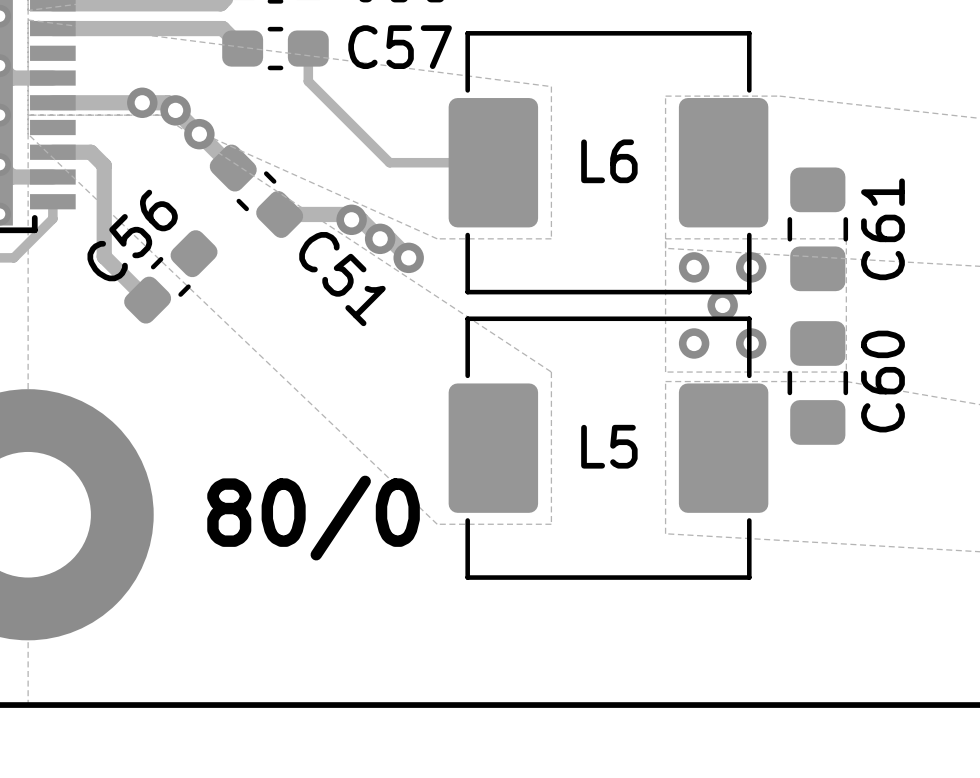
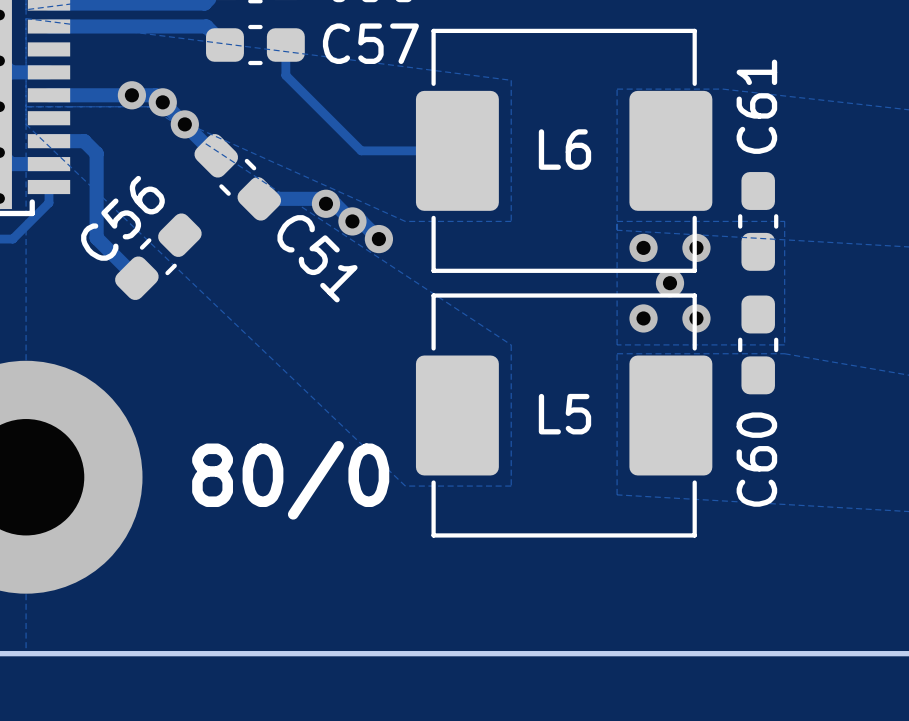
C61 footprint: [787, 167, 849, 292] -> [738, 172, 779, 271]
C61 name position: C61 (882, 229) -> C61 (756, 106)
C60 footprint: [787, 321, 849, 445] -> [738, 295, 779, 395]
C60 name position: C60 (882, 381) -> C60 (756, 459)

